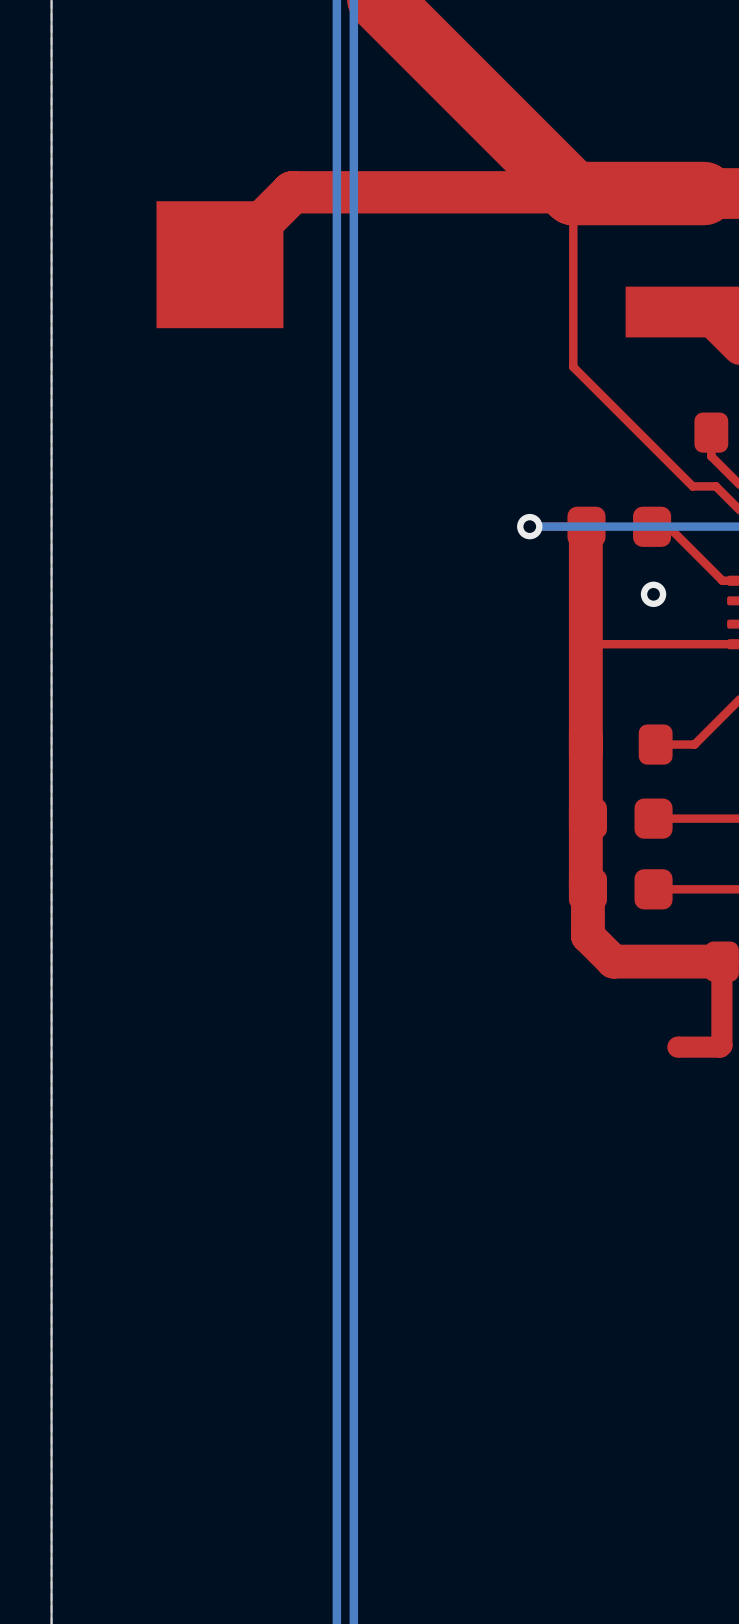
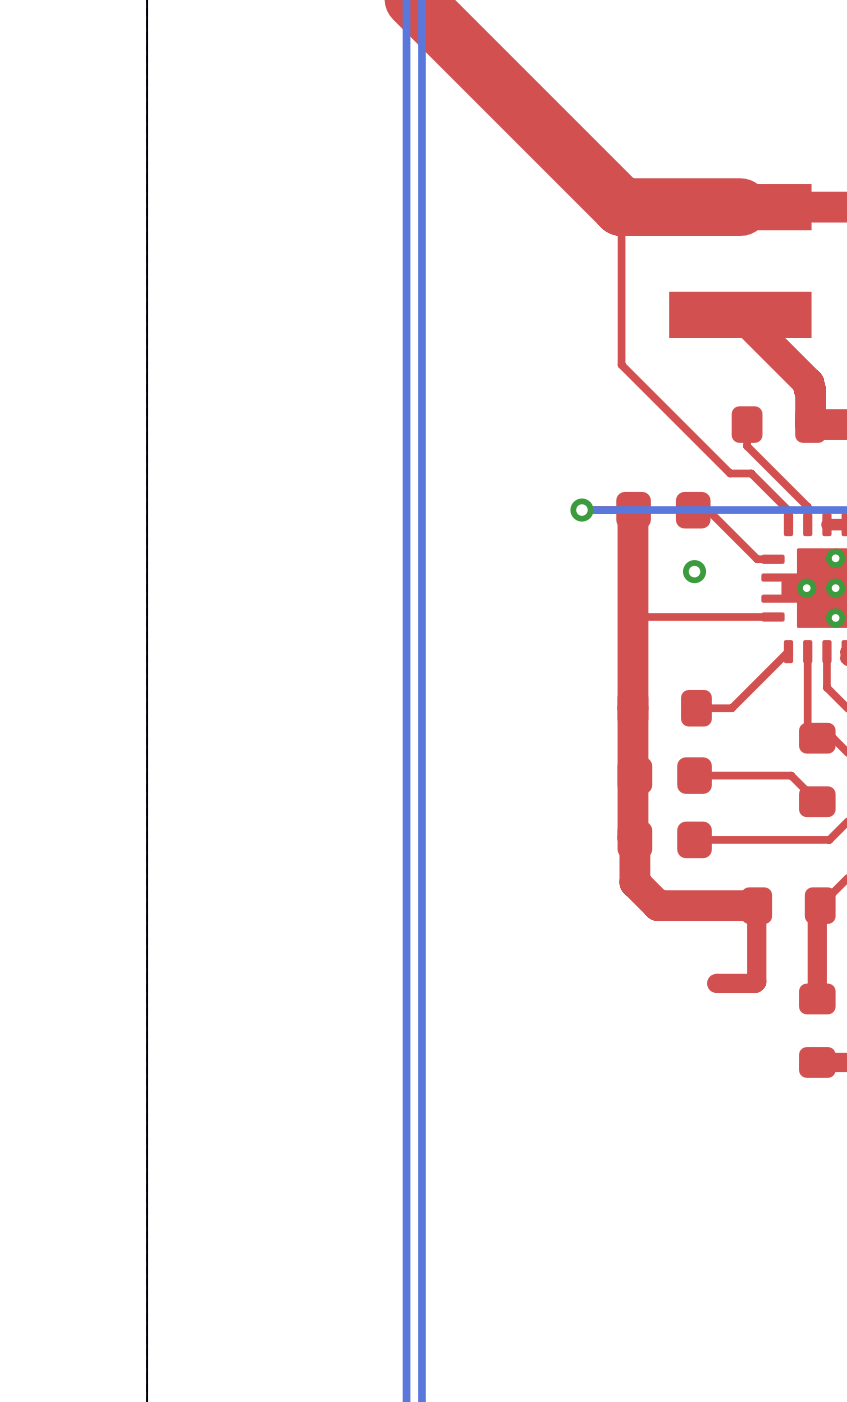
top track: (573, 193) (292, 192) (219, 264) -> none
part: (219, 264) -> none

